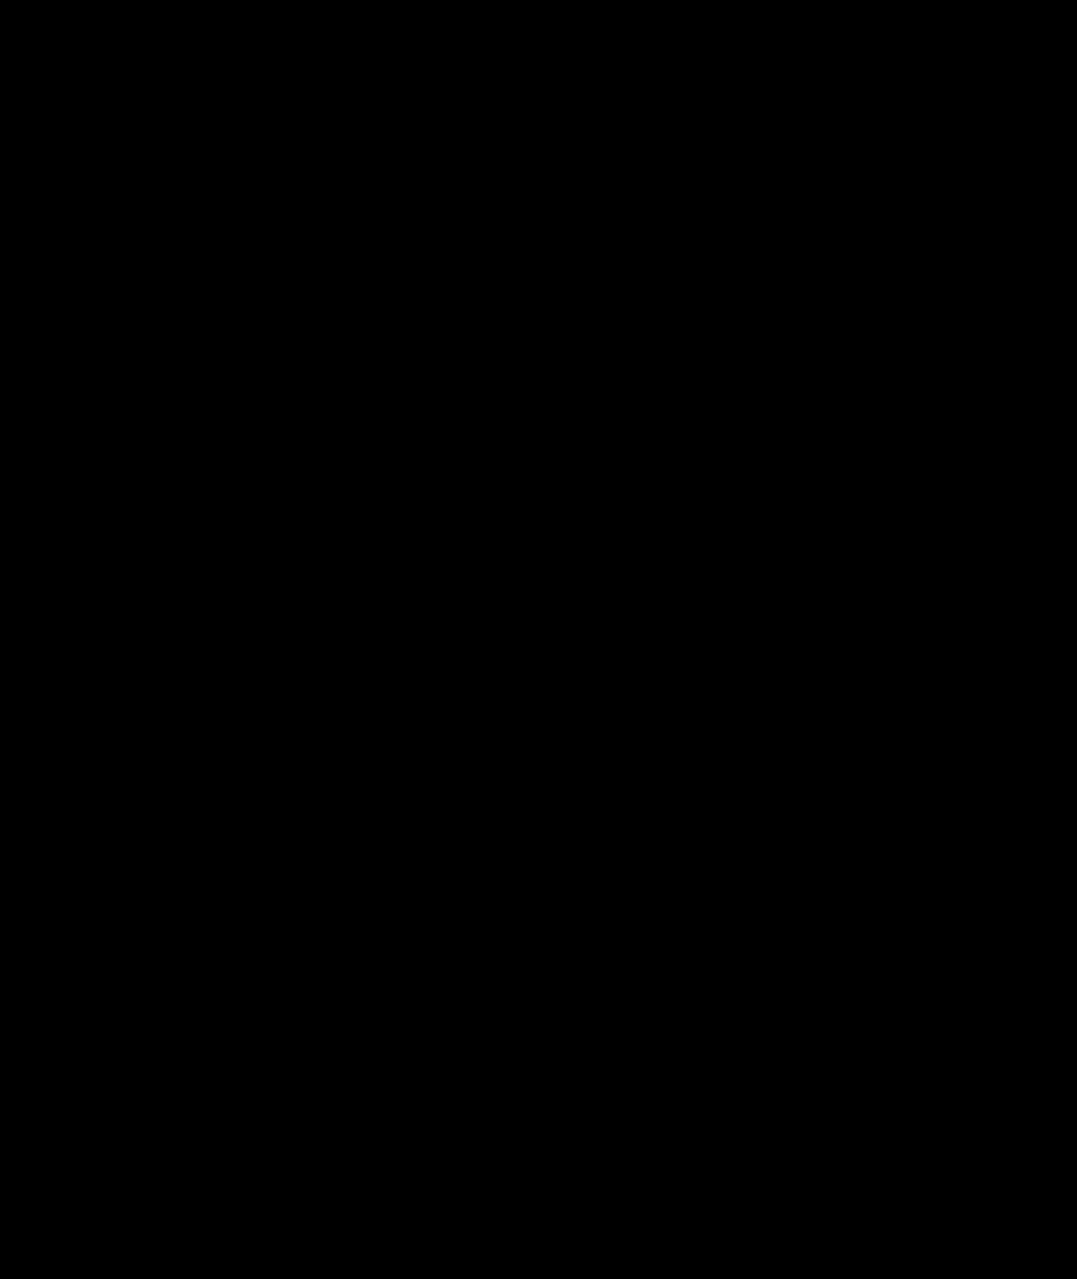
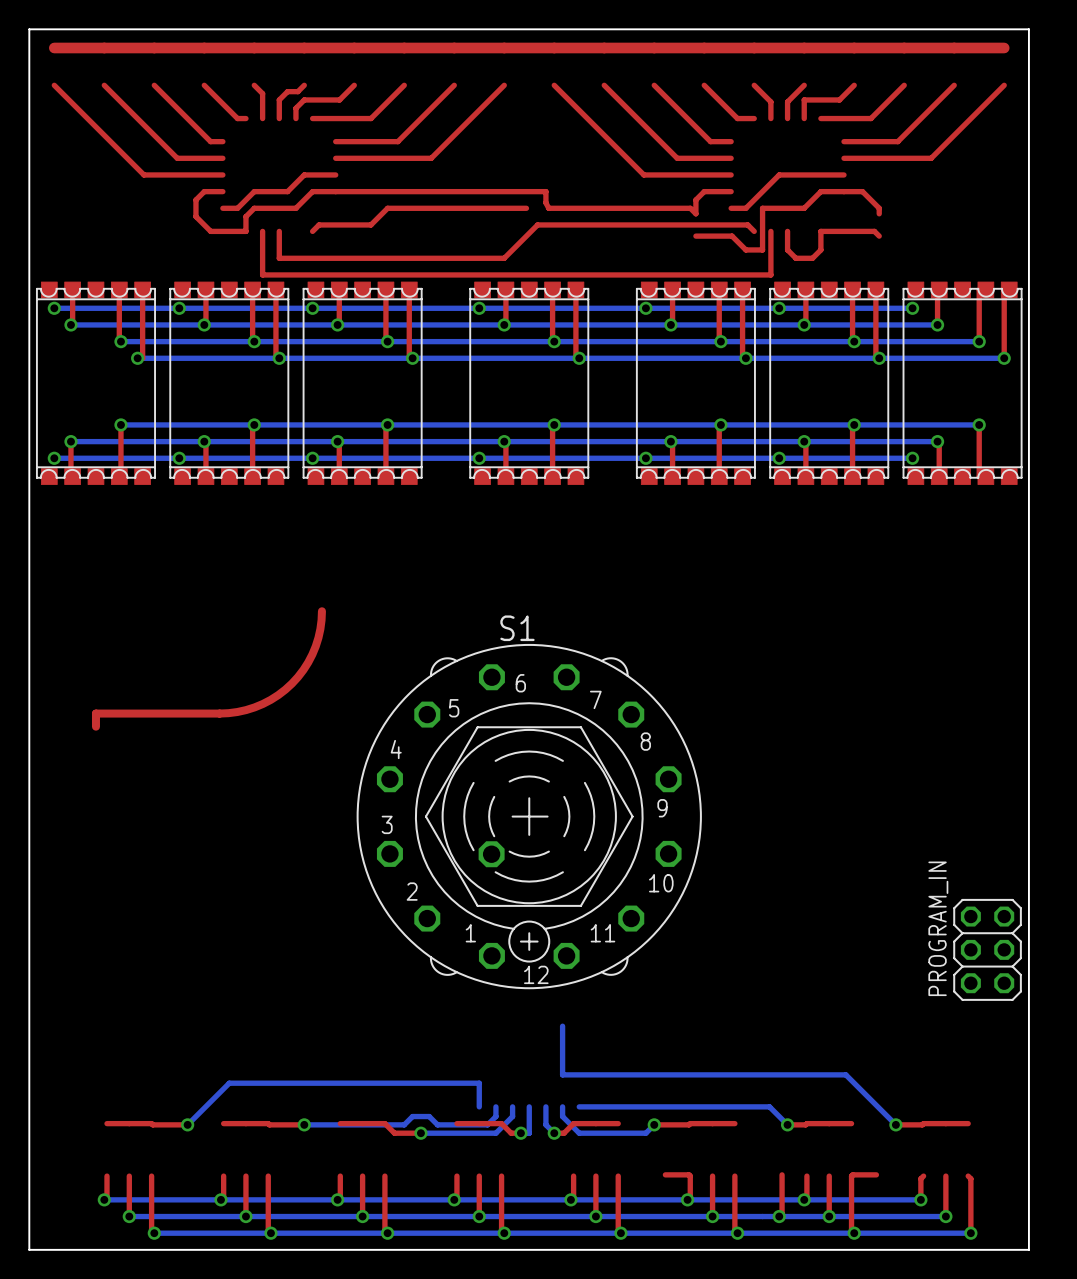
board edge: none -> (29, 29) (1028, 29) (1028, 1249) (29, 1249) (29, 29)
top track: none -> (54, 47) (1004, 47)
top track: none -> (54, 85) (143, 174) (222, 174)
top track: none -> (104, 85) (177, 158) (222, 158)
top track: none -> (154, 85) (210, 141) (222, 141)
top track: none -> (204, 85) (237, 118) (245, 118)
top track: none -> (254, 85) (262, 93) (262, 118)
top track: none -> (304, 85) (297, 91) (287, 91) (279, 99) (279, 118)
top track: none -> (354, 85) (339, 99) (304, 99) (295, 108) (295, 118)
top track: none -> (404, 85) (371, 118) (312, 118)
top track: none -> (454, 85) (397, 141) (335, 141)
top track: none -> (504, 85) (431, 158) (335, 158)
top track: none -> (554, 85) (643, 174) (731, 174)
top track: none -> (604, 85) (677, 158) (731, 158)
top track: none -> (654, 85) (710, 141) (731, 141)
top track: none -> (704, 85) (737, 118) (754, 118)
top track: none -> (754, 85) (770, 101) (770, 118)
top track: none -> (804, 85) (787, 101) (787, 118)
top track: none -> (854, 85) (839, 99) (804, 99) (804, 118)
top track: none -> (904, 85) (870, 118) (820, 118)
top track: none -> (954, 85) (897, 141) (843, 141)
top track: none -> (1004, 85) (931, 158) (843, 158)
top track: none -> (335, 174) (304, 174) (287, 191) (254, 191) (237, 208) (222, 208)
top track: none -> (843, 174) (779, 174) (745, 208) (731, 208)
top track: none -> (222, 191) (204, 191) (195, 199) (195, 216) (210, 231) (245, 231) (245, 216) (254, 208) (295, 208) (312, 191) (545, 191) (545, 202) (548, 208) (690, 208) (695, 213) (695, 199) (704, 191) (731, 191)
top track: none -> (526, 208) (387, 208) (370, 224) (319, 224) (312, 231)
top track: none -> (879, 213) (879, 208) (862, 191) (820, 191) (804, 208) (762, 208) (762, 249) (745, 249) (732, 236) (695, 236)
top track: none -> (262, 231) (262, 274) (770, 274) (770, 231)
top track: none -> (279, 231) (279, 258) (504, 258) (537, 224) (747, 224) (754, 231)
top track: none -> (787, 231) (787, 249) (795, 258) (812, 258) (820, 249) (820, 231) (874, 231) (879, 236)
top track: none -> (72, 289) (72, 324) (70, 324)
top track: none -> (119, 289) (119, 341) (120, 341)
top track: none -> (142, 289) (142, 358) (137, 358)
top track: none -> (205, 289) (205, 324) (204, 324)
top track: none -> (252, 289) (252, 341) (254, 341)
top track: none -> (275, 289) (275, 358) (279, 358)
top track: none -> (339, 289) (339, 324) (337, 324)
top track: none -> (385, 289) (385, 341) (387, 341)
top track: none -> (409, 289) (409, 358) (412, 358)
top track: none -> (505, 289) (505, 324) (504, 324)
top track: none -> (552, 289) (552, 341) (554, 341)
top track: none -> (575, 289) (575, 358) (579, 358)
top track: none -> (672, 289) (672, 324) (670, 324)
top track: none -> (719, 289) (719, 341) (720, 341)
top track: none -> (742, 289) (742, 358) (745, 358)
top track: none -> (805, 289) (805, 324) (804, 324)
top track: none -> (852, 289) (852, 341) (854, 341)
top track: none -> (875, 289) (875, 358) (879, 358)
top track: none -> (939, 289) (937, 289) (937, 324)
top track: none -> (985, 289) (979, 289) (979, 341)
top track: none -> (1009, 289) (1004, 289) (1004, 358)
bottom track: none -> (54, 308) (912, 308)
via: none -> (54, 308)
via: none -> (179, 308)
via: none -> (312, 308)
via: none -> (479, 308)
via: none -> (645, 308)
via: none -> (779, 308)
via: none -> (912, 308)
bottom track: none -> (70, 324) (937, 324)
via: none -> (70, 324)
via: none -> (204, 324)
via: none -> (337, 324)
via: none -> (504, 324)
via: none -> (670, 324)
via: none -> (804, 324)
via: none -> (937, 324)
bottom track: none -> (120, 341) (979, 341)
via: none -> (120, 341)
via: none -> (254, 341)
via: none -> (387, 341)
via: none -> (554, 341)
via: none -> (720, 341)
via: none -> (854, 341)
via: none -> (979, 341)
bottom track: none -> (137, 358) (1004, 358)
via: none -> (137, 358)
via: none -> (279, 358)
via: none -> (412, 358)
via: none -> (579, 358)
via: none -> (745, 358)
via: none -> (879, 358)
via: none -> (1004, 358)
part: none -> (95, 383)
part: none -> (229, 383)
part: none -> (362, 383)
part: none -> (529, 383)
part: none -> (695, 383)
part: none -> (829, 383)
part: none -> (962, 383)
top track: none -> (120, 424) (120, 476) (119, 476)
bottom track: none -> (120, 424) (979, 424)
via: none -> (120, 424)
top track: none -> (254, 424) (252, 424) (252, 476)
via: none -> (254, 424)
top track: none -> (387, 424) (385, 424) (385, 476)
via: none -> (387, 424)
top track: none -> (554, 424) (552, 424) (552, 476)
via: none -> (554, 424)
top track: none -> (720, 424) (719, 424) (719, 476)
via: none -> (720, 424)
top track: none -> (854, 424) (852, 424) (852, 476)
via: none -> (854, 424)
top track: none -> (979, 424) (979, 476) (985, 476)
via: none -> (979, 424)
top track: none -> (70, 441) (70, 476) (72, 476)
bottom track: none -> (70, 441) (937, 441)
via: none -> (70, 441)
top track: none -> (204, 441) (205, 441) (205, 476)
via: none -> (204, 441)
top track: none -> (337, 441) (339, 441) (339, 476)
via: none -> (337, 441)
top track: none -> (504, 441) (505, 441) (505, 476)
via: none -> (504, 441)
top track: none -> (670, 441) (672, 441) (672, 476)
via: none -> (670, 441)
top track: none -> (804, 441) (805, 441) (805, 476)
via: none -> (804, 441)
top track: none -> (937, 441) (939, 441) (939, 476)
via: none -> (937, 441)
bottom track: none -> (54, 458) (912, 458)
via: none -> (54, 458)
via: none -> (179, 458)
via: none -> (312, 458)
via: none -> (479, 458)
via: none -> (645, 458)
via: none -> (779, 458)
via: none -> (912, 458)
top track: none -> (321, 611) (318, 637) (308, 662) (291, 683) (278, 695) (262, 703) (246, 710) (228, 713) (95, 713) (95, 726)
S1: none -> (529, 816)
PROGRAM_IN: none -> (987, 949)
bottom track: none -> (562, 1026) (562, 1074) (845, 1074) (895, 1124)
bottom track: none -> (479, 1106) (479, 1083) (229, 1083) (187, 1124)
bottom track: none -> (495, 1106) (495, 1116) (487, 1124) (437, 1124) (429, 1116) (412, 1116) (404, 1124) (304, 1124)
bottom track: none -> (512, 1106) (512, 1116) (495, 1133) (420, 1133)
bottom track: none -> (529, 1106) (529, 1133) (520, 1133)
bottom track: none -> (545, 1106) (545, 1124) (554, 1133)
bottom track: none -> (562, 1106) (562, 1116) (579, 1133) (645, 1133) (654, 1124)
bottom track: none -> (579, 1106) (769, 1106) (787, 1124)
top track: none -> (107, 1123) (187, 1124)
top track: none -> (223, 1123) (304, 1124)
top track: none -> (340, 1123) (384, 1123) (394, 1133) (420, 1133)
top track: none -> (456, 1123) (501, 1123) (511, 1133) (520, 1133)
top track: none -> (618, 1123) (573, 1123) (564, 1133) (554, 1133)
top track: none -> (734, 1123) (654, 1124)
top track: none -> (851, 1123) (787, 1124)
top track: none -> (968, 1123) (895, 1124)
via: none -> (187, 1124)
via: none -> (304, 1124)
via: none -> (654, 1124)
via: none -> (787, 1124)
via: none -> (895, 1124)
via: none -> (420, 1133)
via: none -> (520, 1133)
via: none -> (554, 1133)
top track: none -> (665, 1174) (690, 1176) (690, 1197) (687, 1199)
top track: none -> (782, 1174) (782, 1213) (779, 1216)
top track: none -> (876, 1174) (851, 1176) (851, 1230) (854, 1233)
top track: none -> (107, 1176) (107, 1197) (104, 1199)
top track: none -> (129, 1176) (129, 1216)
top track: none -> (151, 1176) (151, 1230) (154, 1233)
top track: none -> (223, 1176) (223, 1197) (220, 1199)
top track: none -> (245, 1176) (245, 1216)
top track: none -> (268, 1176) (268, 1230) (270, 1233)
top track: none -> (340, 1176) (340, 1197) (337, 1199)
top track: none -> (362, 1176) (362, 1216)
top track: none -> (384, 1176) (384, 1230) (387, 1233)
top track: none -> (456, 1176) (456, 1197) (454, 1199)
top track: none -> (479, 1176) (479, 1216)
top track: none -> (501, 1176) (501, 1230) (504, 1233)
top track: none -> (573, 1176) (573, 1197) (570, 1199)
top track: none -> (595, 1176) (595, 1216)
top track: none -> (618, 1176) (618, 1230) (620, 1233)
top track: none -> (712, 1176) (712, 1216)
top track: none -> (734, 1176) (734, 1230) (737, 1233)
top track: none -> (806, 1176) (806, 1197) (804, 1199)
top track: none -> (829, 1176) (829, 1216)
top track: none -> (923, 1176) (920, 1178) (920, 1199)
top track: none -> (945, 1176) (945, 1216)
top track: none -> (968, 1176) (970, 1178) (970, 1233)
bottom track: none -> (104, 1199) (920, 1199)
via: none -> (104, 1199)
via: none -> (220, 1199)
via: none -> (337, 1199)
via: none -> (454, 1199)
via: none -> (570, 1199)
via: none -> (687, 1199)
via: none -> (804, 1199)
via: none -> (920, 1199)
bottom track: none -> (129, 1216) (945, 1216)
via: none -> (129, 1216)
via: none -> (245, 1216)
via: none -> (362, 1216)
via: none -> (479, 1216)
via: none -> (595, 1216)
via: none -> (712, 1216)
via: none -> (779, 1216)
via: none -> (829, 1216)
via: none -> (945, 1216)
bottom track: none -> (154, 1233) (970, 1233)
via: none -> (154, 1233)
via: none -> (270, 1233)
via: none -> (387, 1233)
via: none -> (504, 1233)
via: none -> (620, 1233)
via: none -> (737, 1233)
via: none -> (854, 1233)
via: none -> (970, 1233)

